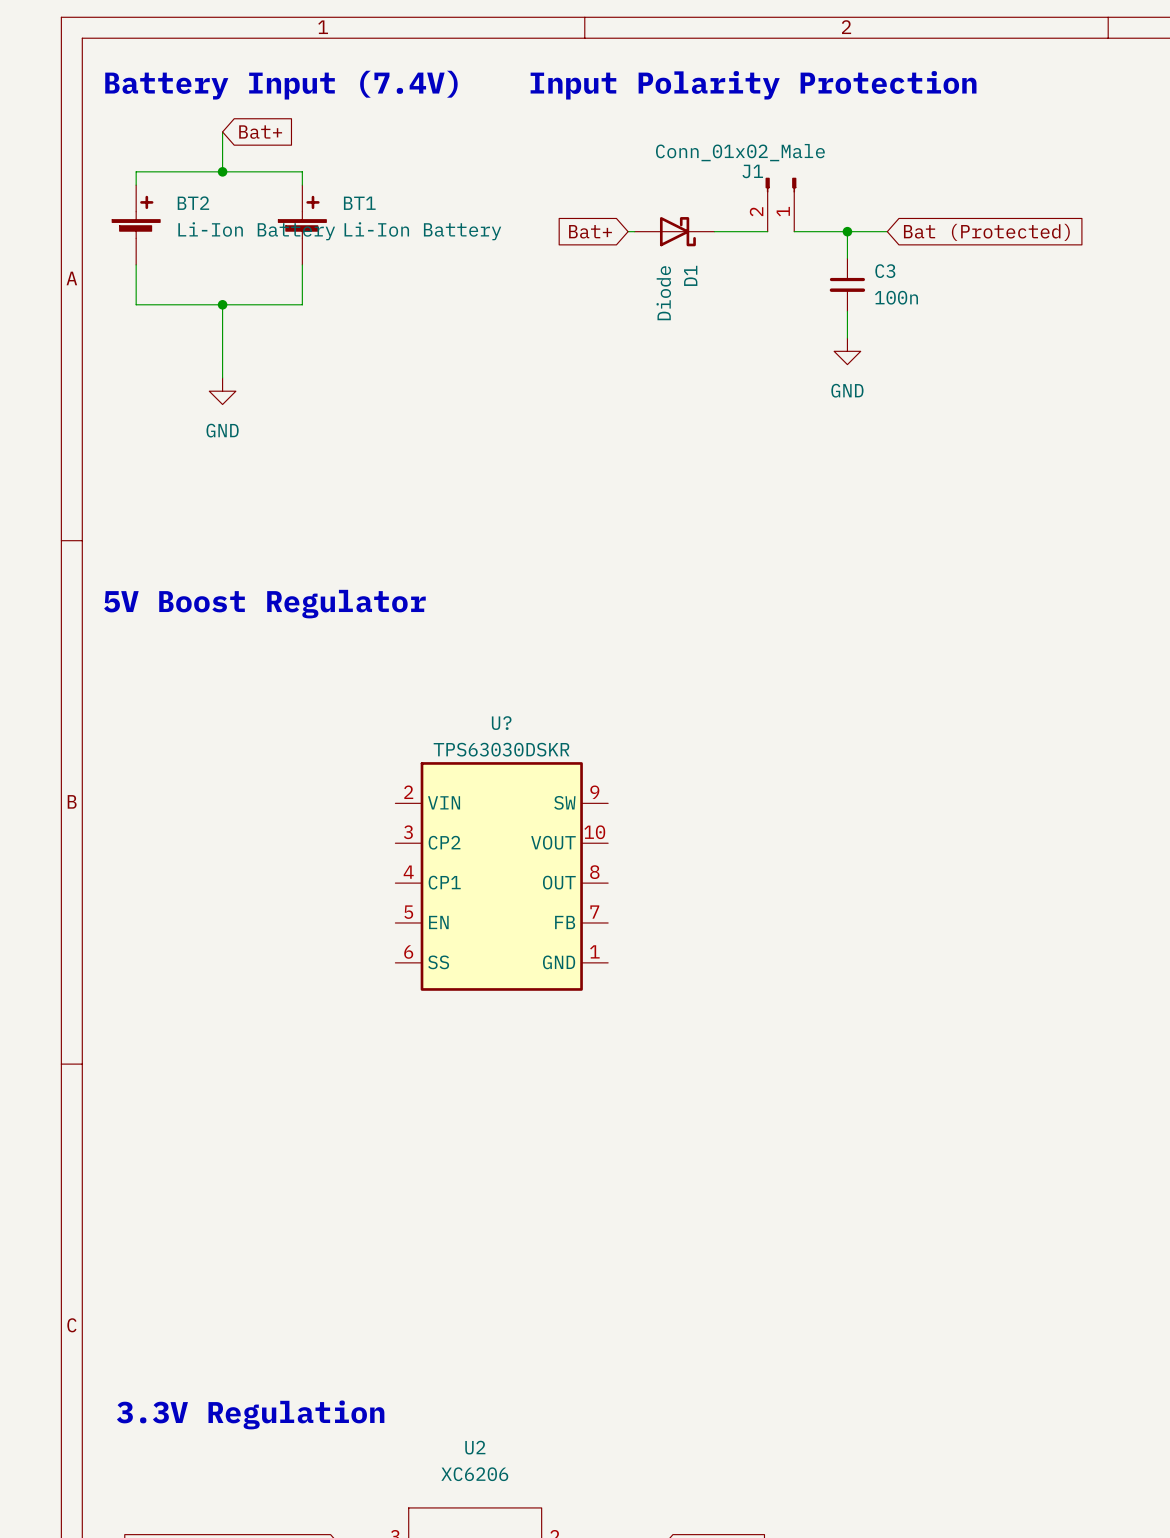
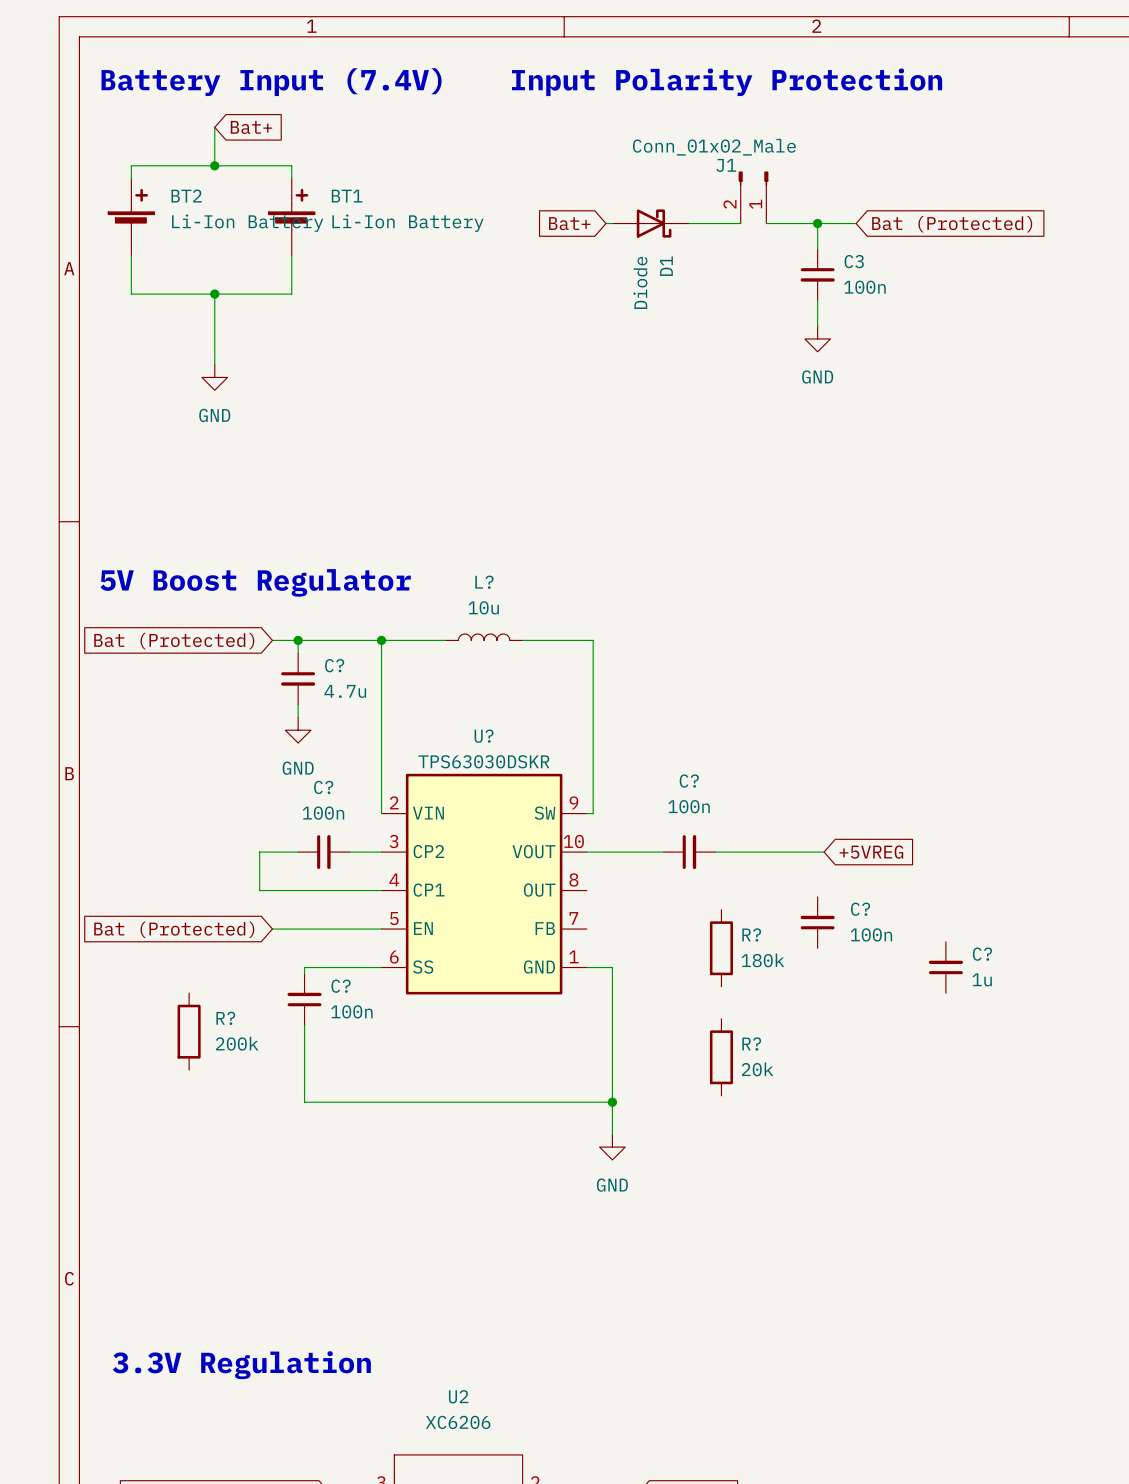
L?: none -> 10u (484, 637)
wire: none -> (272, 640) (445, 640)
wire: none -> (298, 640) (298, 653)
junction: none -> (298, 640)
wire: none -> (381, 640) (381, 813)
junction: none -> (381, 640)
wire: none -> (522, 640) (593, 640) (593, 813) (586, 813)
global label: none -> Bat (Protected) (174, 641)
C?: none -> 4.7u (298, 678)
wire: none -> (298, 704) (298, 717)
power symbol: none -> GND (298, 730)
U? position: (501, 876) -> (484, 884)
wire: none -> (298, 852) (259, 852) (259, 890) (381, 890)
C?: none -> 100n (323, 852)
wire: none -> (349, 852) (381, 852)
wire: none -> (586, 852) (663, 852)
C?: none -> 100n (689, 852)
wire: none -> (715, 852) (824, 852)
global label: none -> +5VREG (871, 852)
C?: none -> 100n (817, 922)
wire: none -> (272, 929) (381, 929)
global label: none -> Bat (Protected) (174, 929)
R?: none -> 180k (721, 948)
wire: none -> (381, 967) (304, 967) (304, 973)
wire: none -> (586, 967) (612, 967) (612, 1134)
C?: none -> 1u (945, 967)
C?: none -> 100n (304, 999)
wire: none -> (304, 1025) (304, 1102) (612, 1102)
R?: none -> 200k (189, 1031)
R?: none -> 20k (721, 1057)
junction: none -> (612, 1102)
power symbol: none -> GND (612, 1147)

